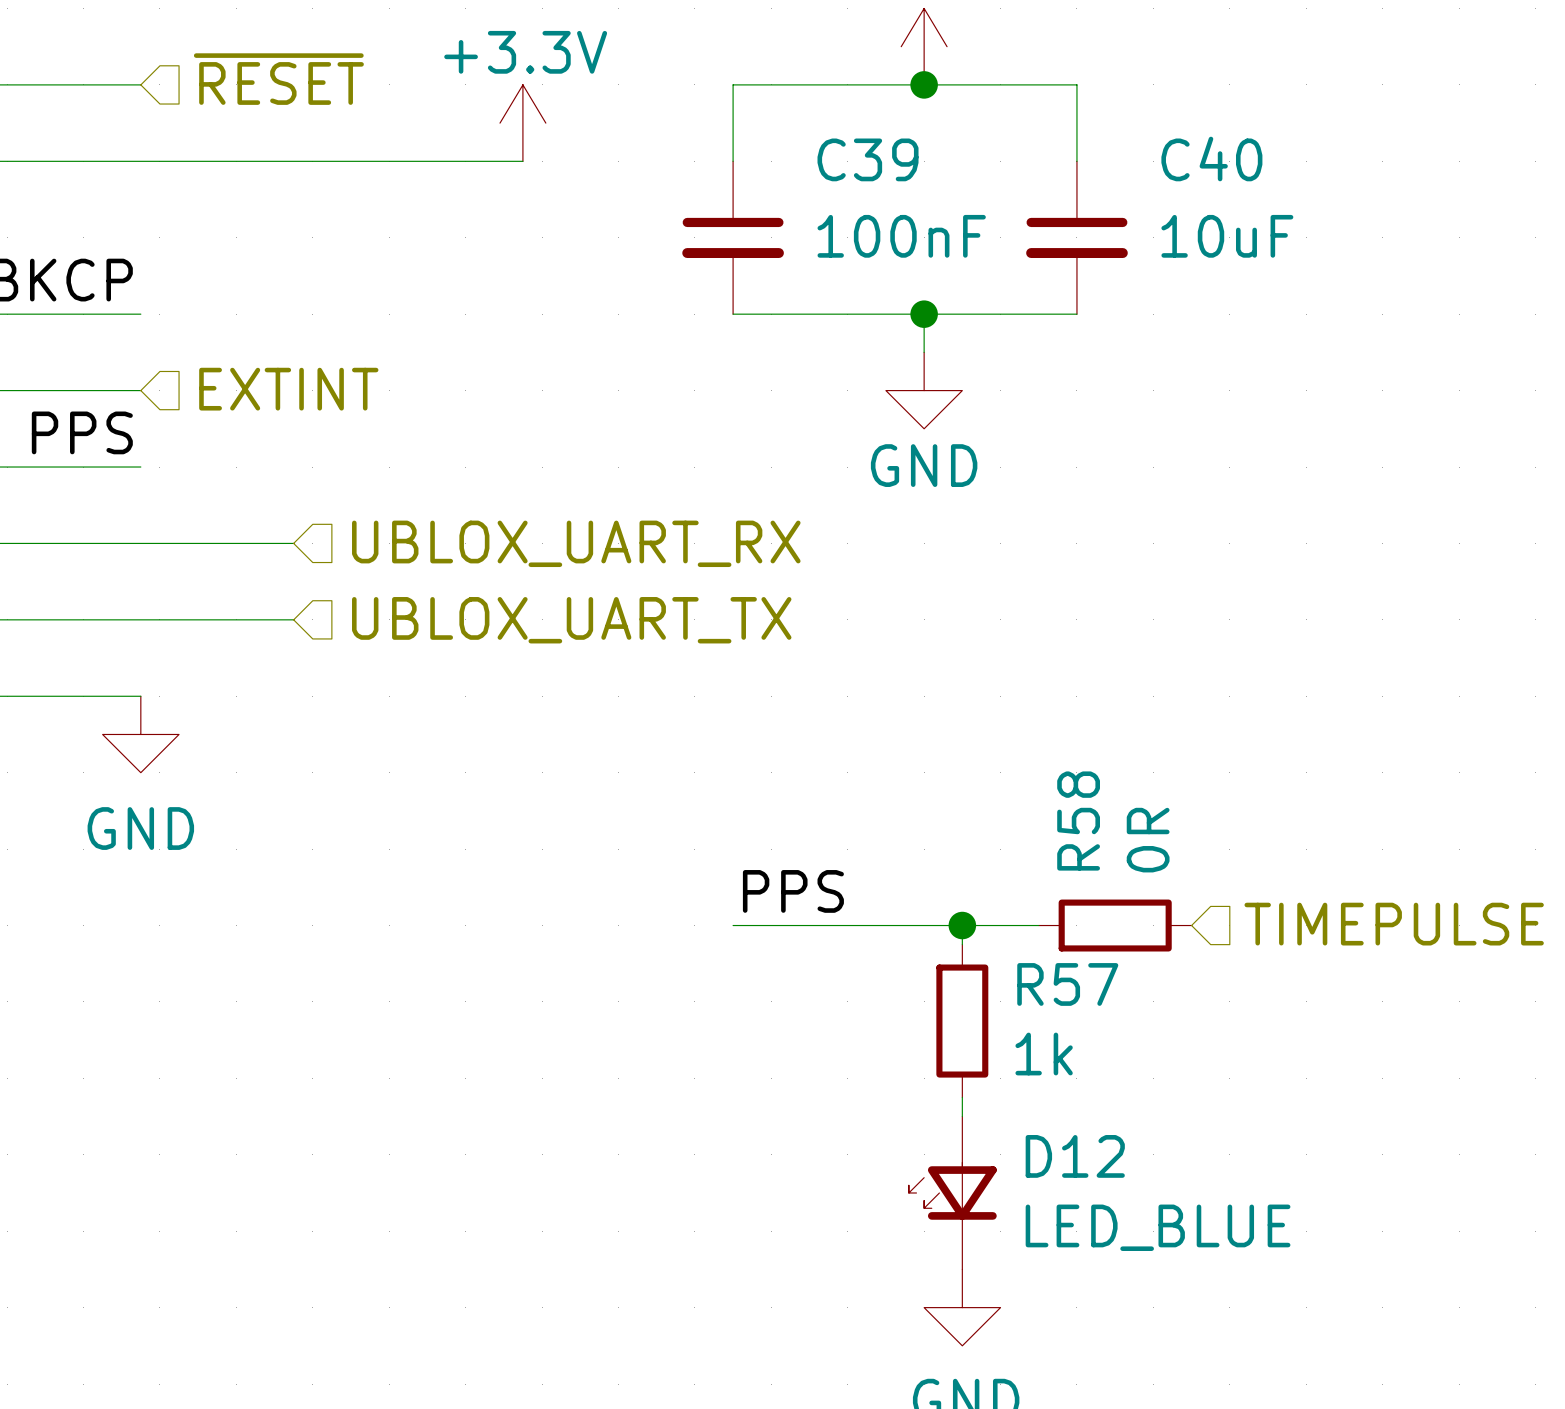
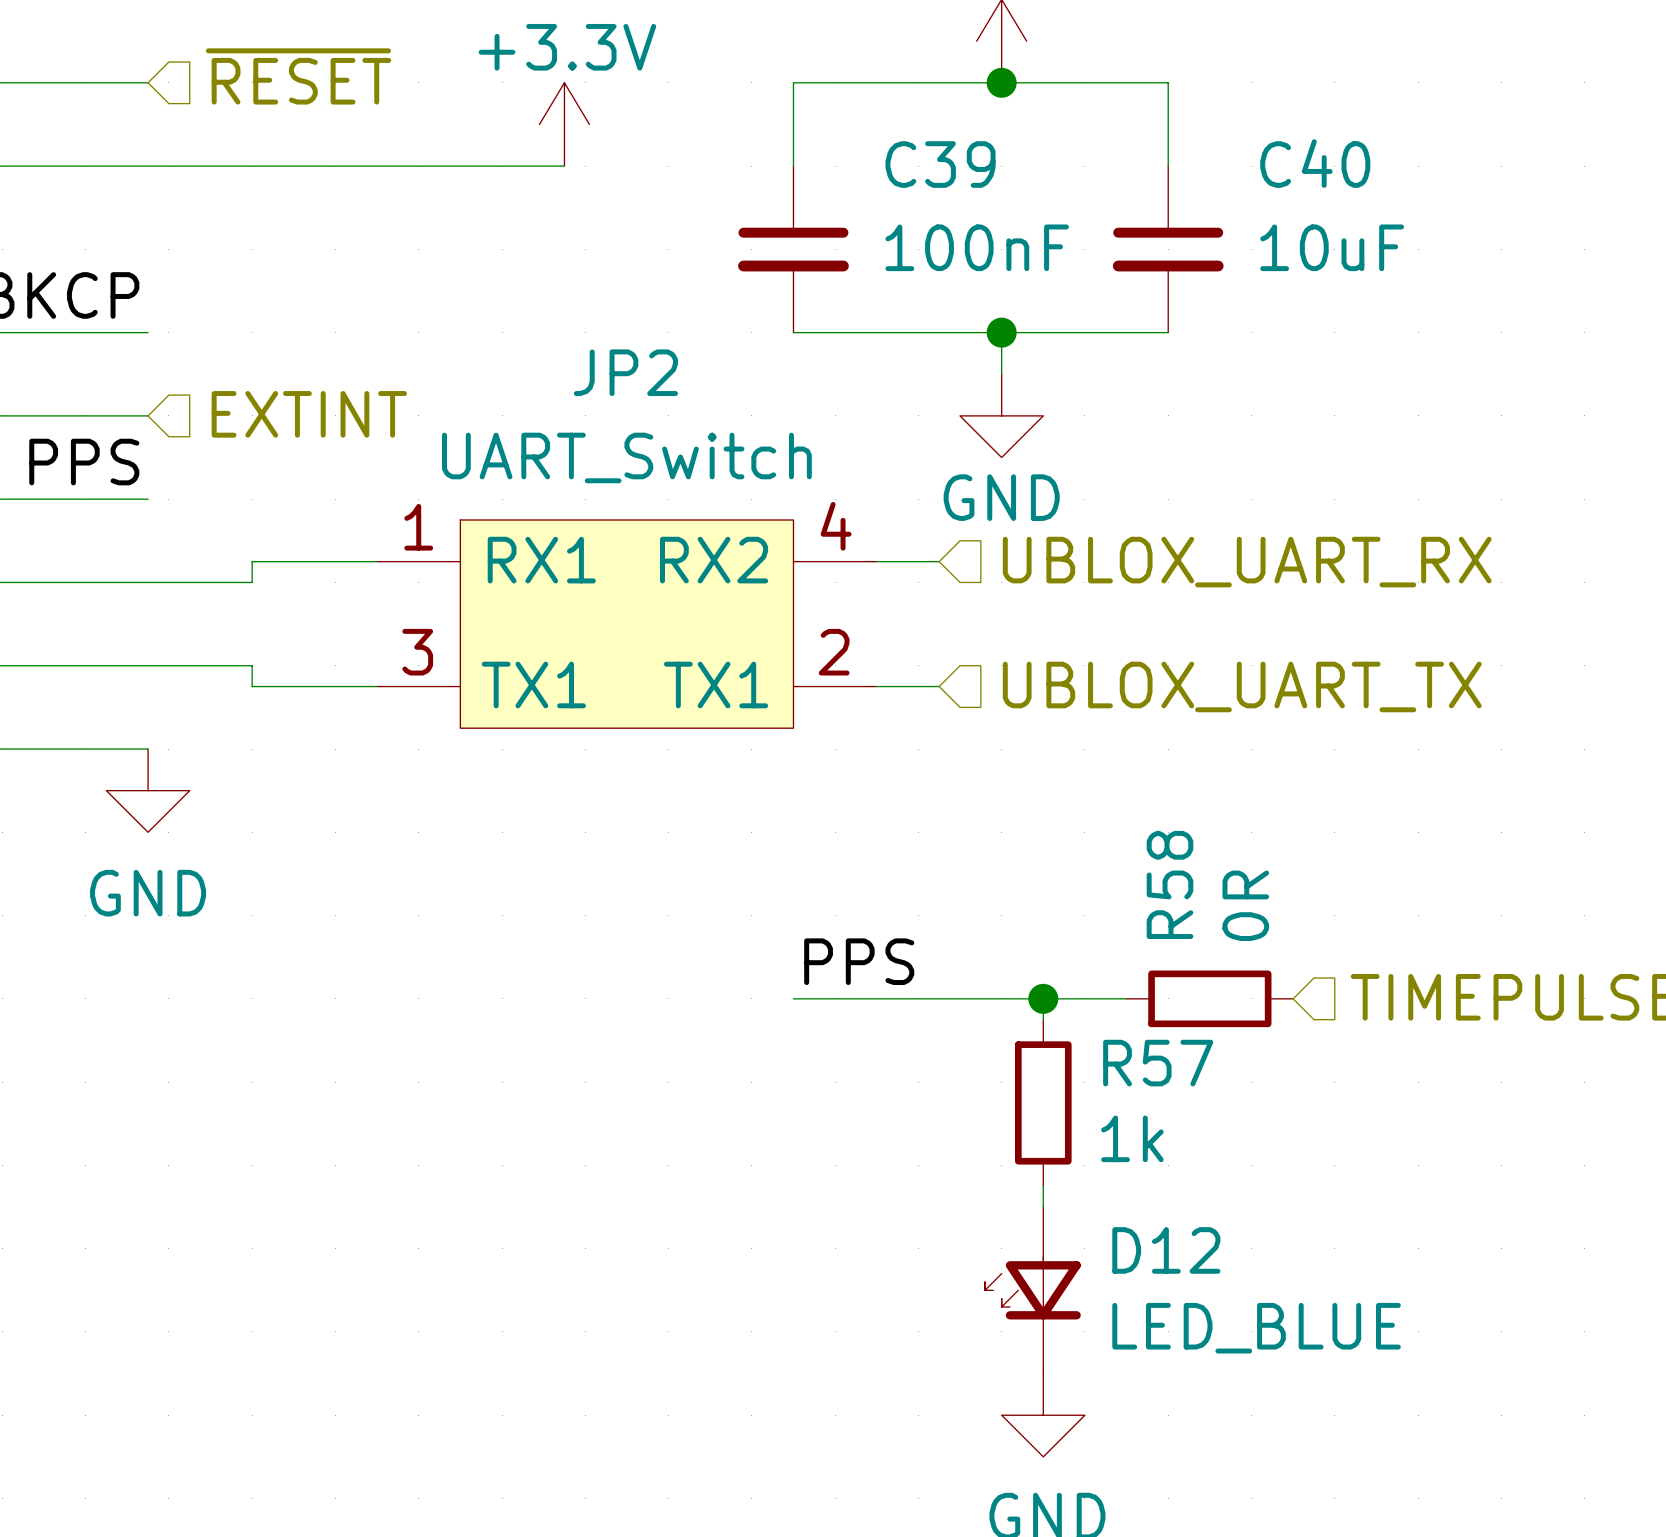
wire: none -> (876, 561) (939, 561)
wire: (236, 543) (293, 543) -> (252, 582) (252, 561) (377, 561)
hierarchical label position: UBLOX_UART_RX (576, 543) -> UBLOX_UART_RX (1247, 562)
JP2: none -> UART_Switch (626, 624)
wire: (236, 619) (293, 619) -> (252, 665) (252, 686) (377, 686)
hierarchical label position: UBLOX_UART_TX (571, 620) -> UBLOX_UART_TX (1242, 686)
wire: none -> (876, 686) (939, 686)

